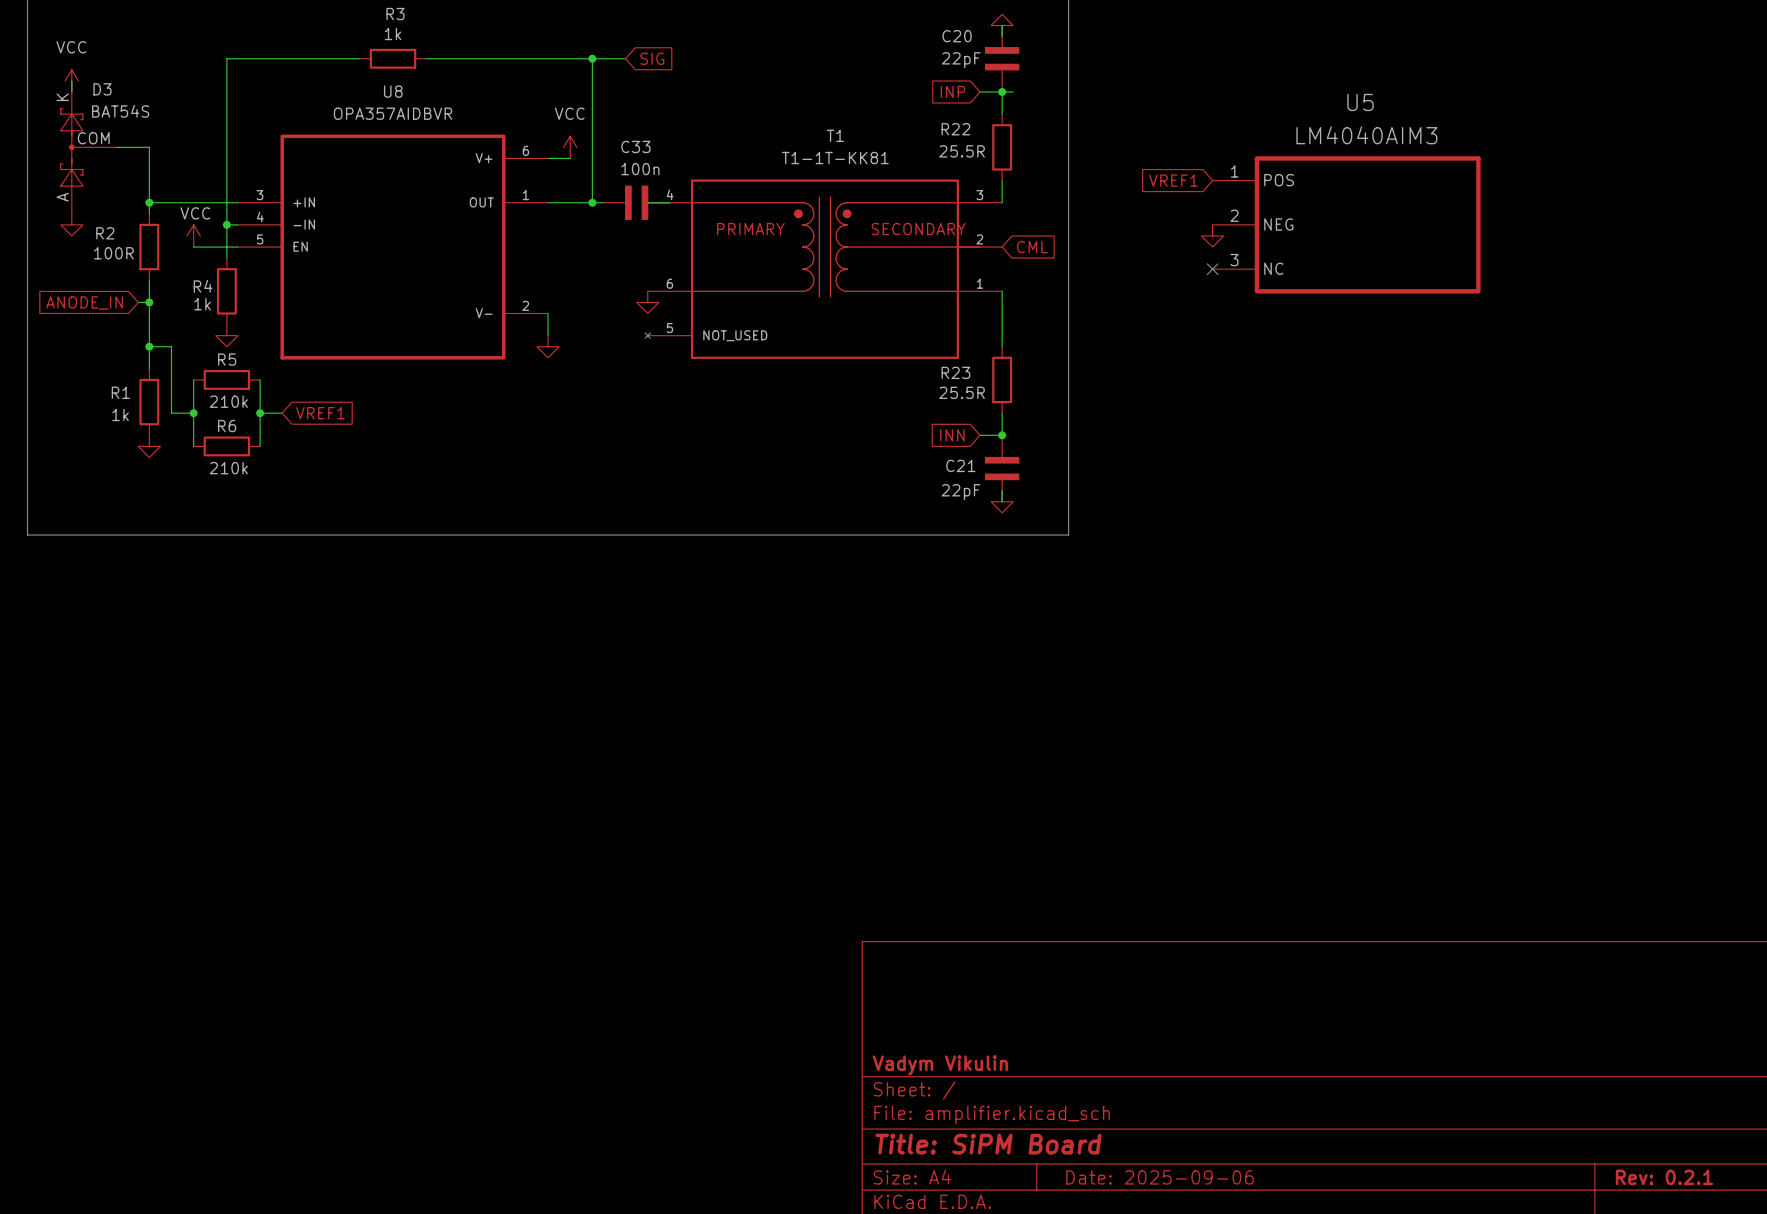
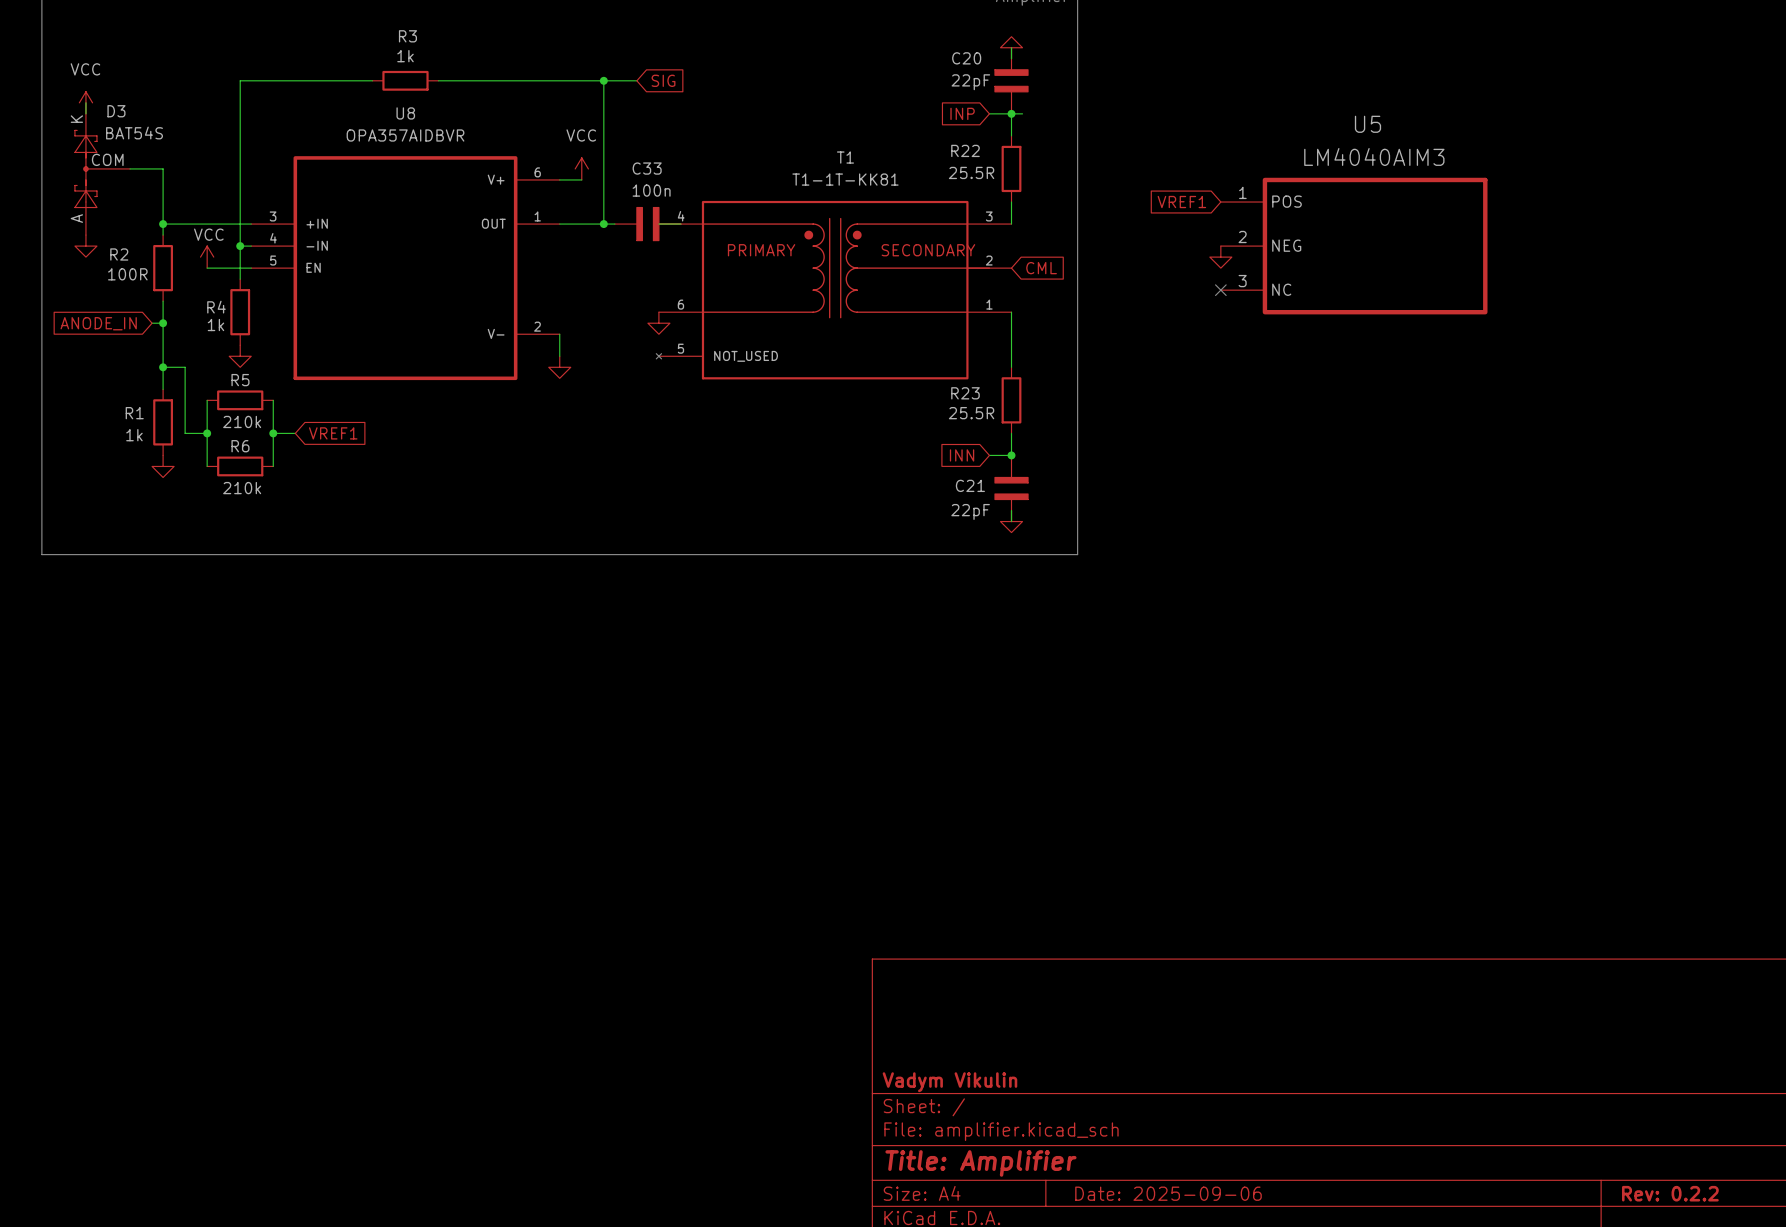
title block: Title: SiPM Board (988, 1144) -> Title: Amplifier (980, 1163)
title block: Rev: 0.2.1 (1664, 1177) -> Rev: 0.2.2 (1670, 1193)

